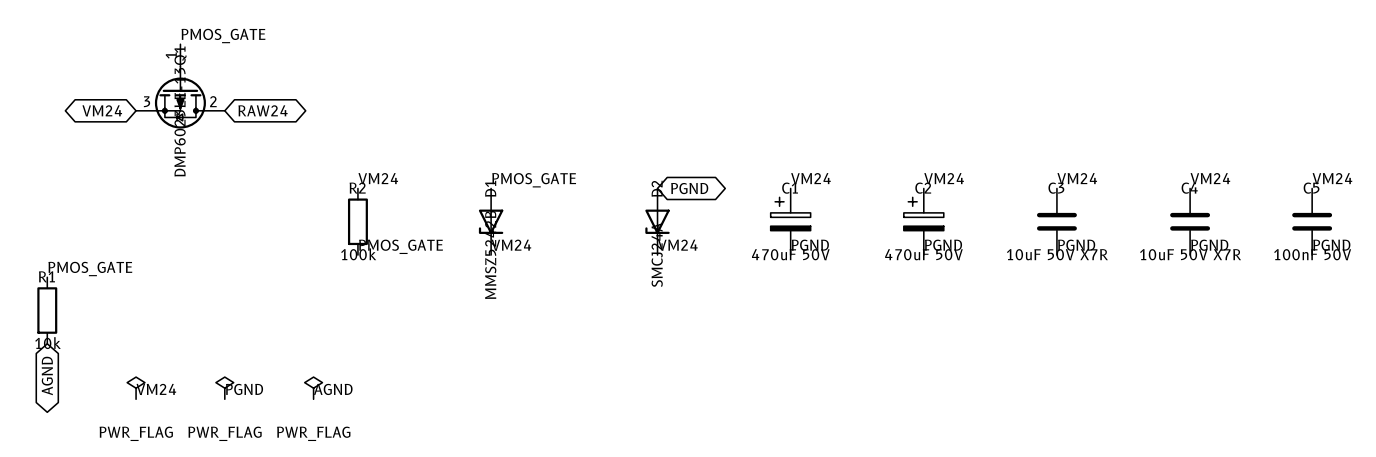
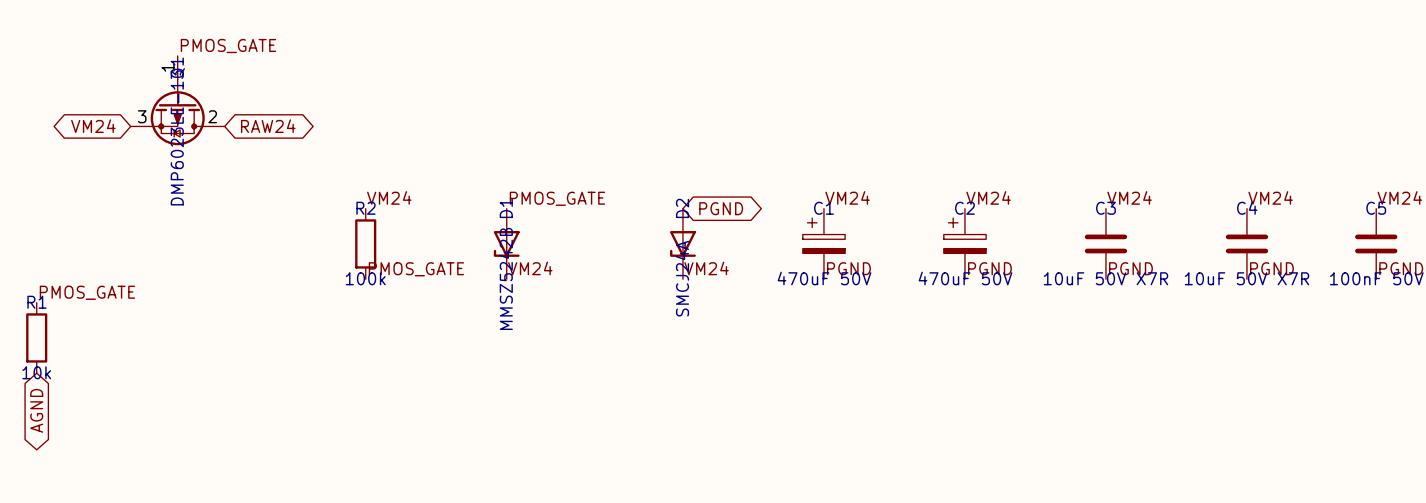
power symbol: PWR_FLAG (136, 388) -> none
power symbol: PWR_FLAG (224, 388) -> none
power symbol: PWR_FLAG (313, 388) -> none
label: VM24 (156, 389) -> none
label: PGND (244, 389) -> none
label: AGND (333, 389) -> none

